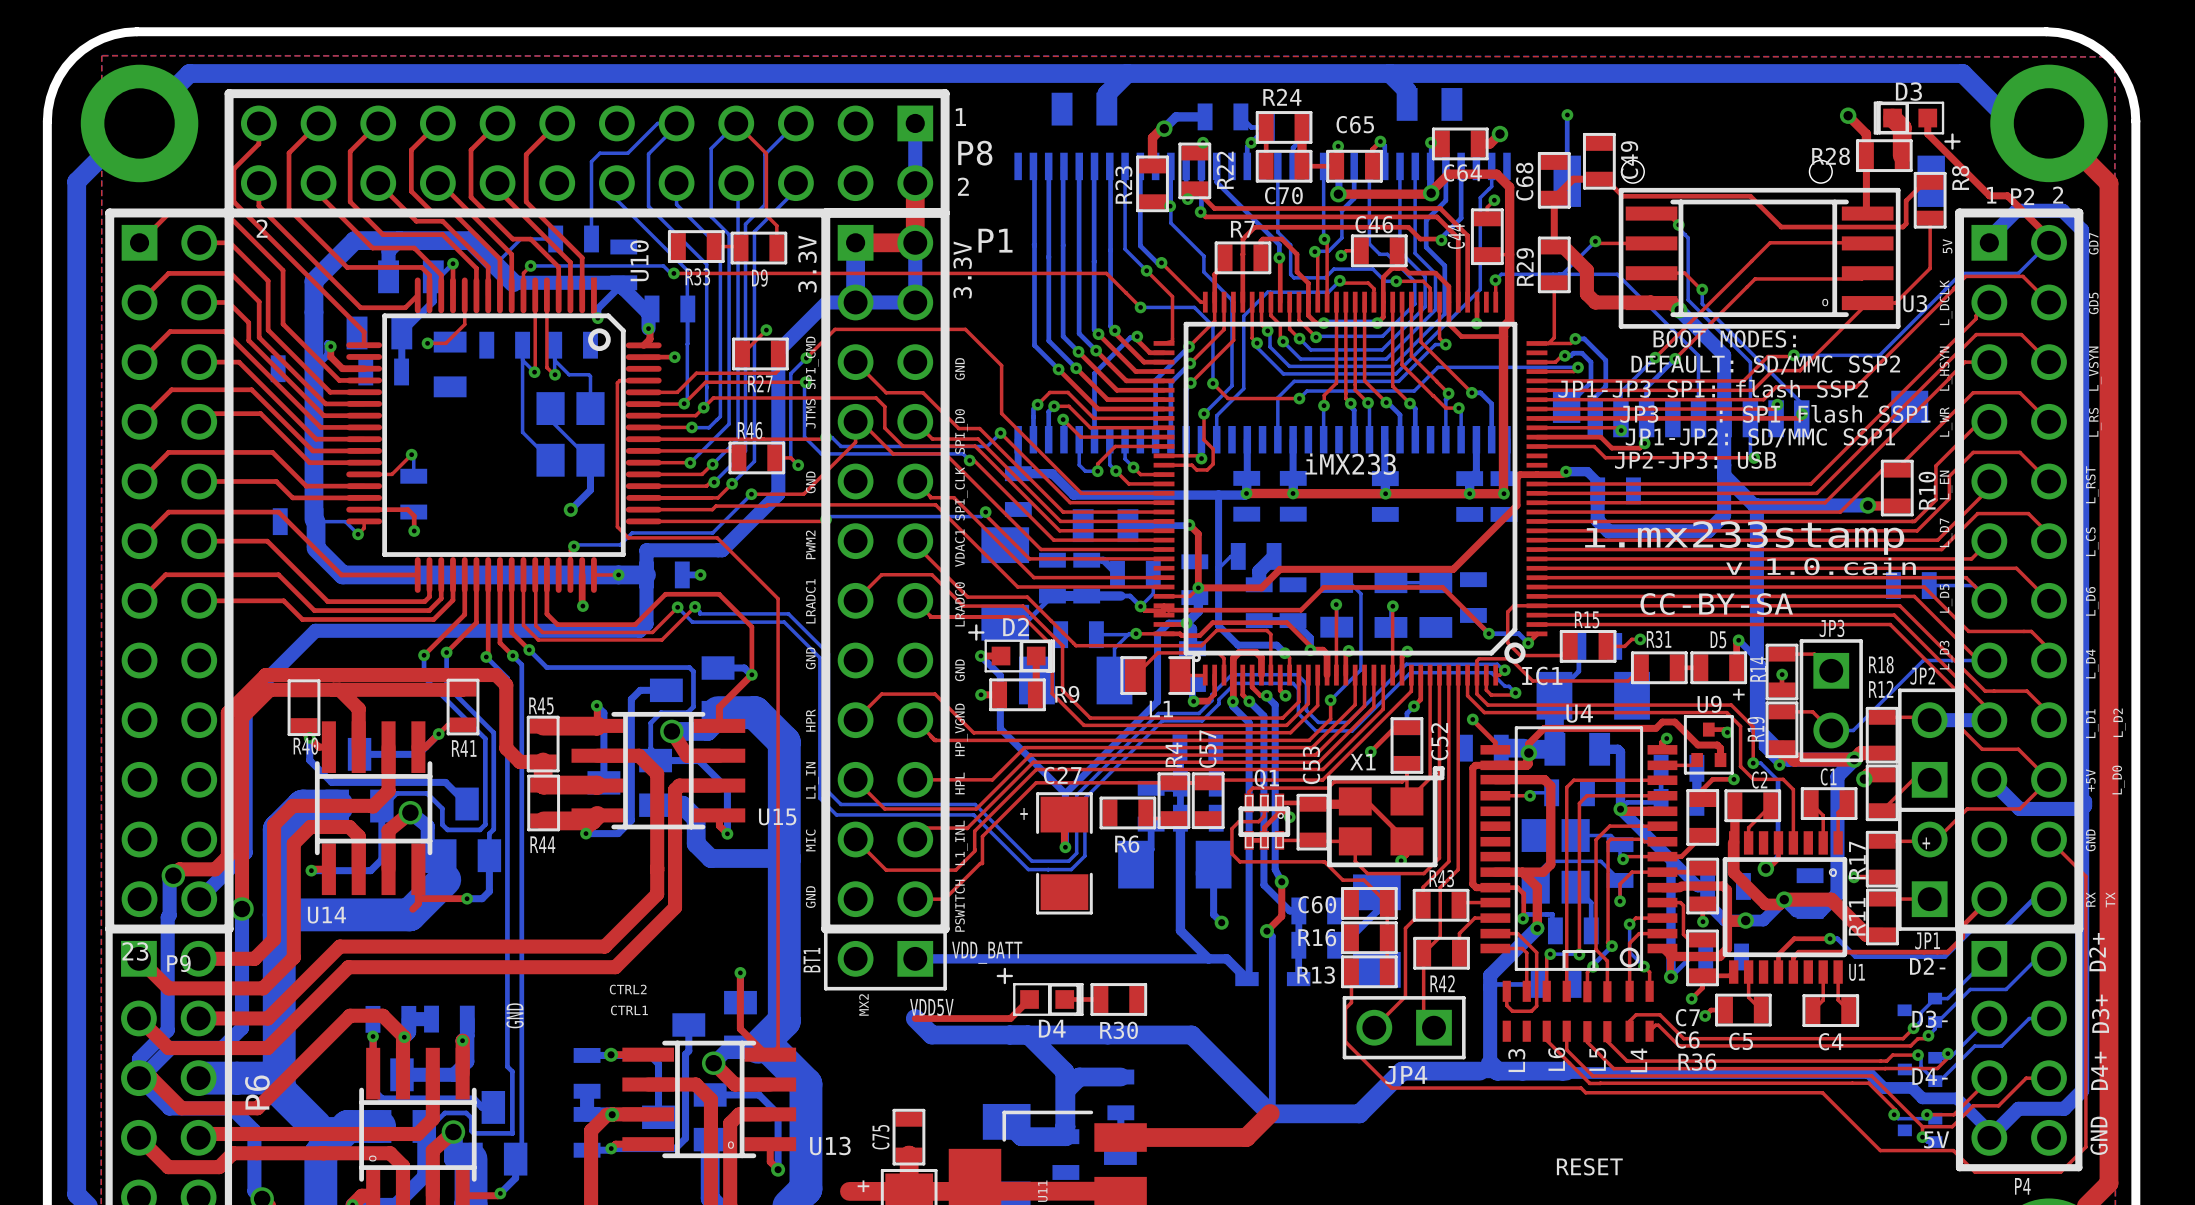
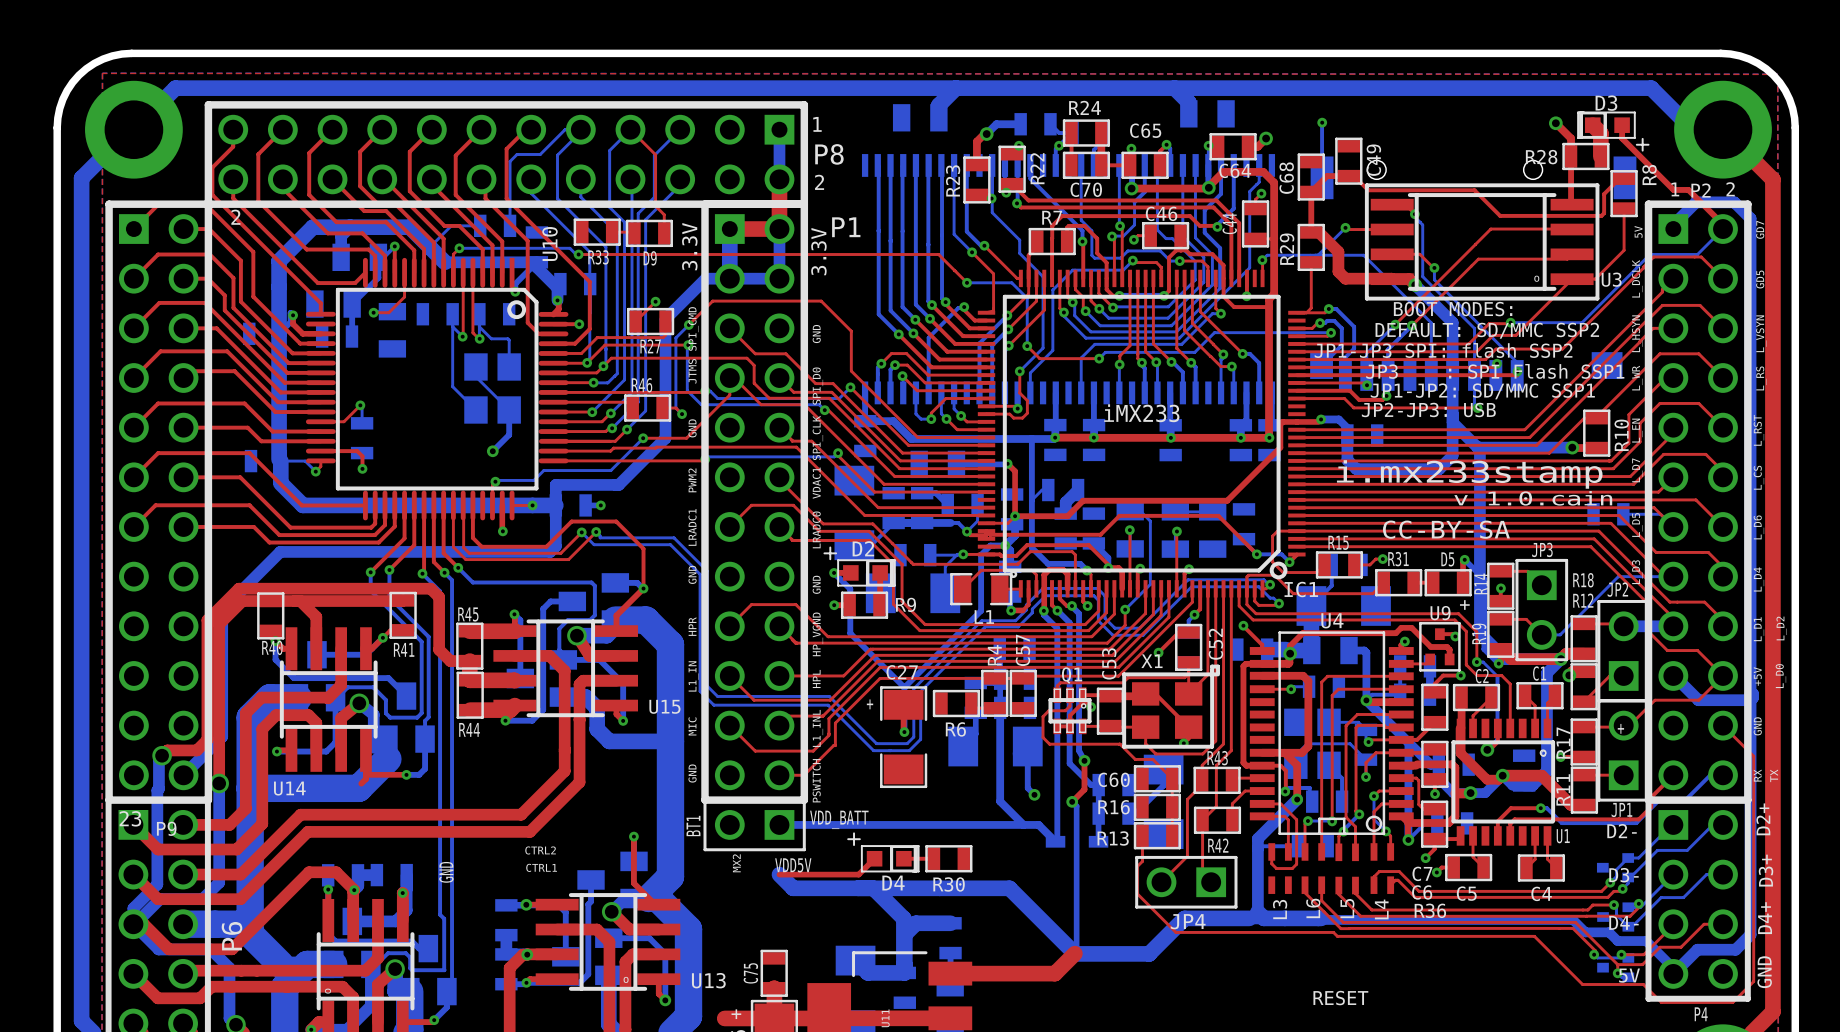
top track: none -> (481, 179) (485, 182) (485, 198) (527, 240) (527, 322) (538, 333) (553, 333)
top track: (643, 380) (619, 380) (617, 383) (617, 526) (628, 537) (717, 537) (778, 598) (778, 1046) (770, 1054) -> (553, 343) (575, 343) (589, 328) (589, 281) (506, 198) (506, 148) (525, 129) (531, 129)

